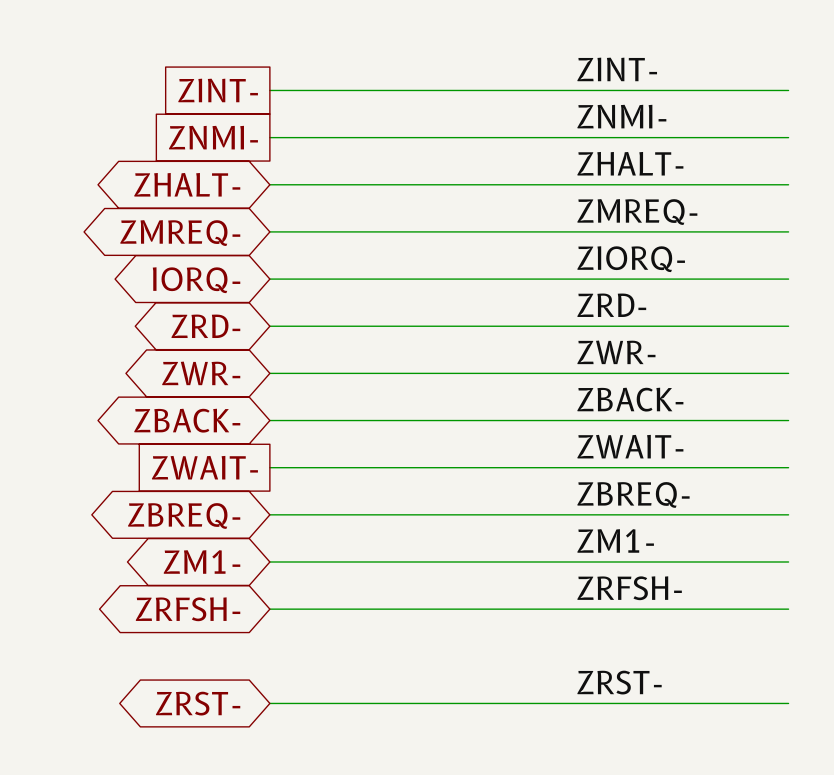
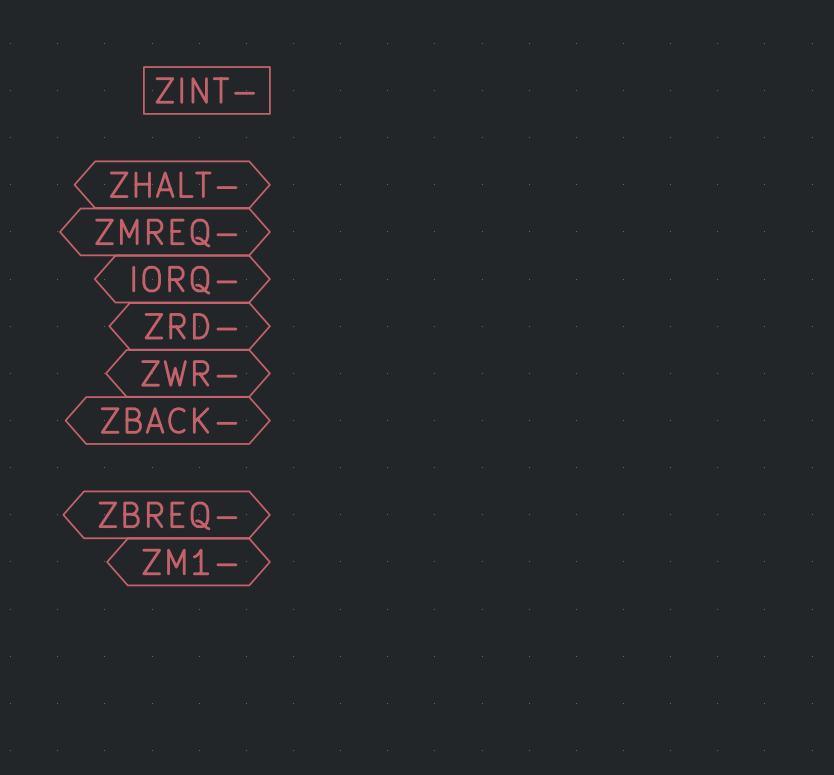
label: ZINT- (617, 69) -> none
wire: (269, 90) (788, 90) -> none
label: ZNMI- (621, 116) -> none
global label: ZNMI- (213, 137) -> none
wire: (269, 137) (788, 137) -> none
label: ZHALT- (630, 163) -> none
wire: (269, 184) (788, 184) -> none
label: ZMREQ- (637, 212) -> none
wire: (269, 231) (788, 231) -> none
label: ZIORQ- (631, 259) -> none
wire: (269, 279) (788, 279) -> none
label: ZRD- (611, 305) -> none
wire: (269, 326) (788, 326) -> none
label: ZWR- (616, 352) -> none
wire: (269, 373) (788, 373) -> none
label: ZBACK- (630, 399) -> none
wire: (269, 420) (788, 420) -> none
label: ZWAIT- (630, 446) -> none
global label: ZWAIT- (204, 467) -> none
wire: (269, 467) (788, 467) -> none
label: ZBREQ- (633, 494) -> none
wire: (269, 514) (788, 514) -> none
label: ZM1- (615, 540) -> none
wire: (269, 561) (788, 561) -> none
label: ZRFSH- (629, 588) -> none
global label: ZRFSH- (188, 609) -> none
wire: (269, 609) (788, 609) -> none
label: ZRST- (619, 682) -> none
global label: ZRST- (198, 703) -> none
wire: (269, 703) (788, 703) -> none

